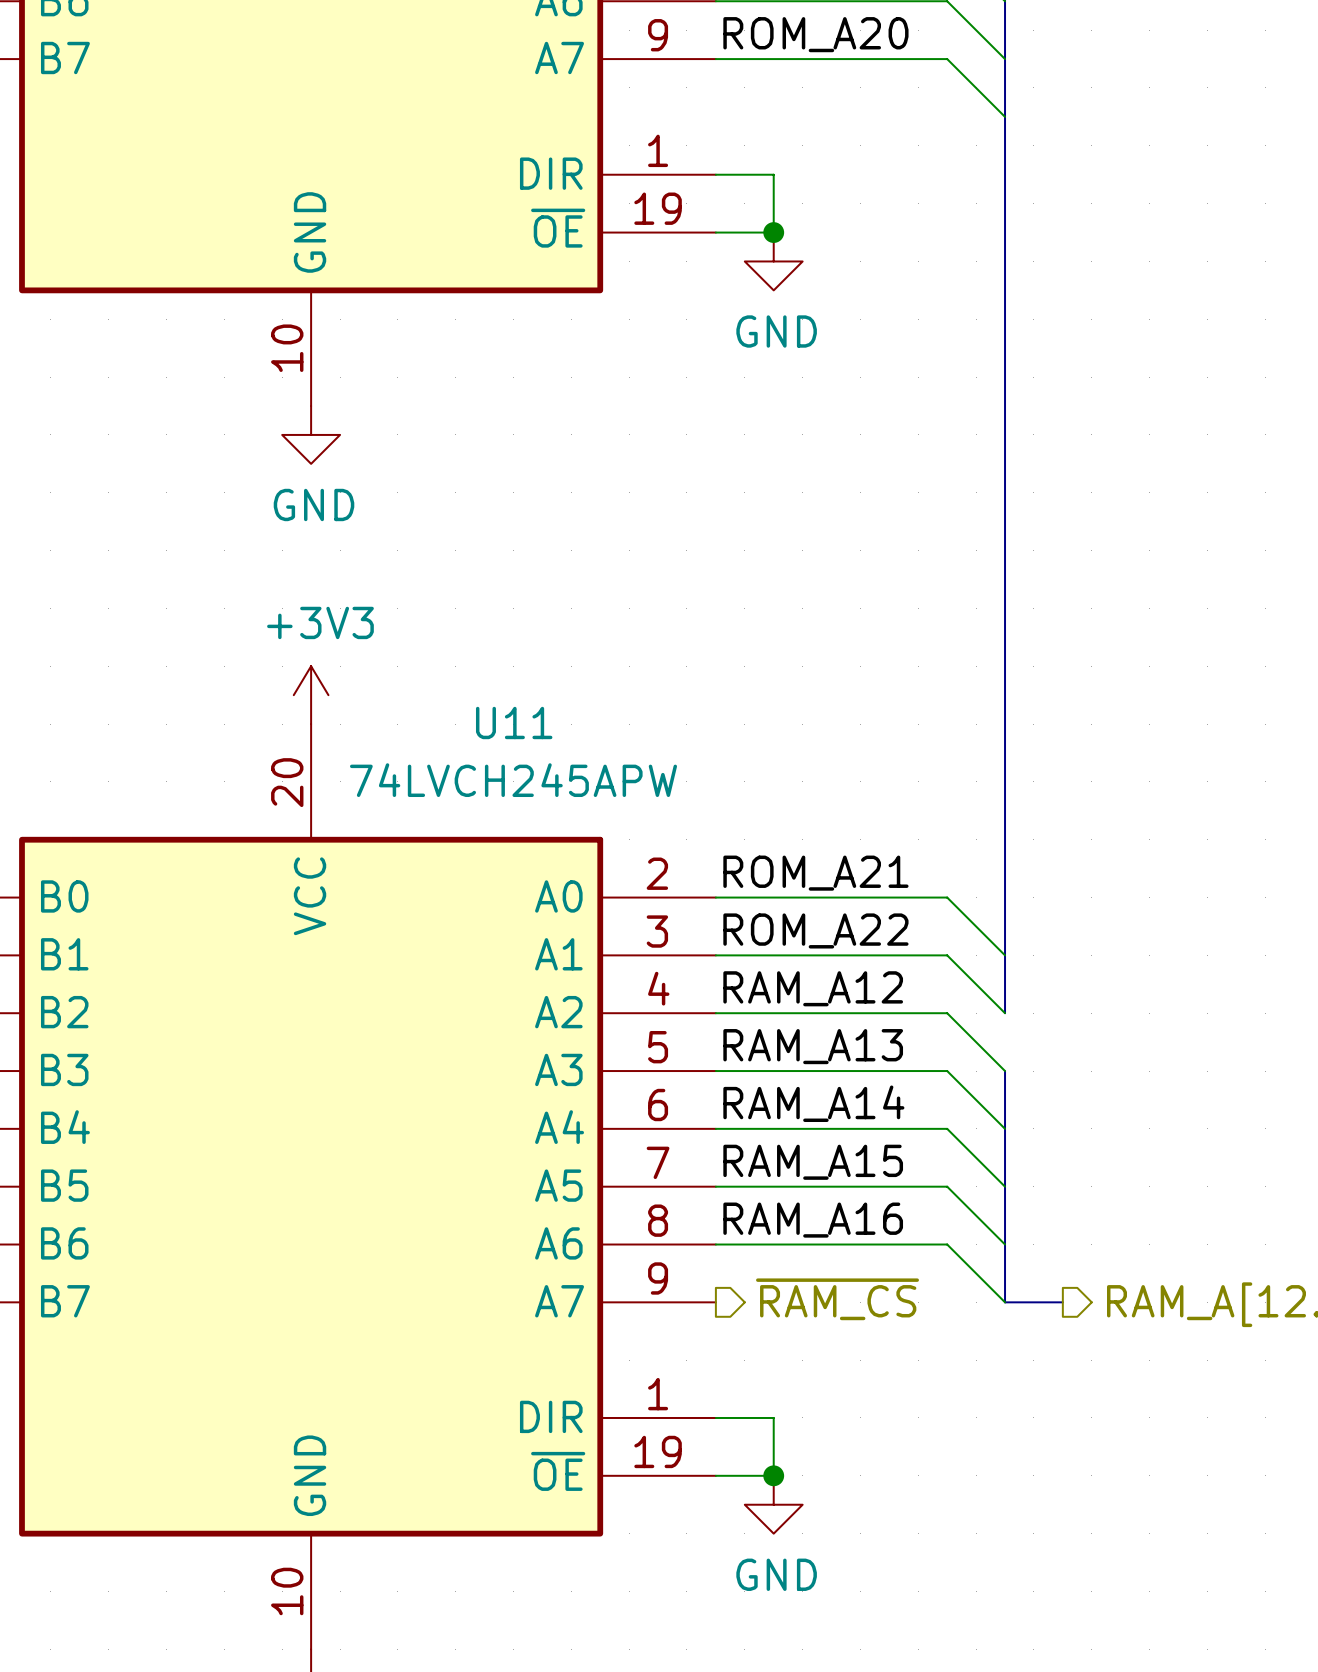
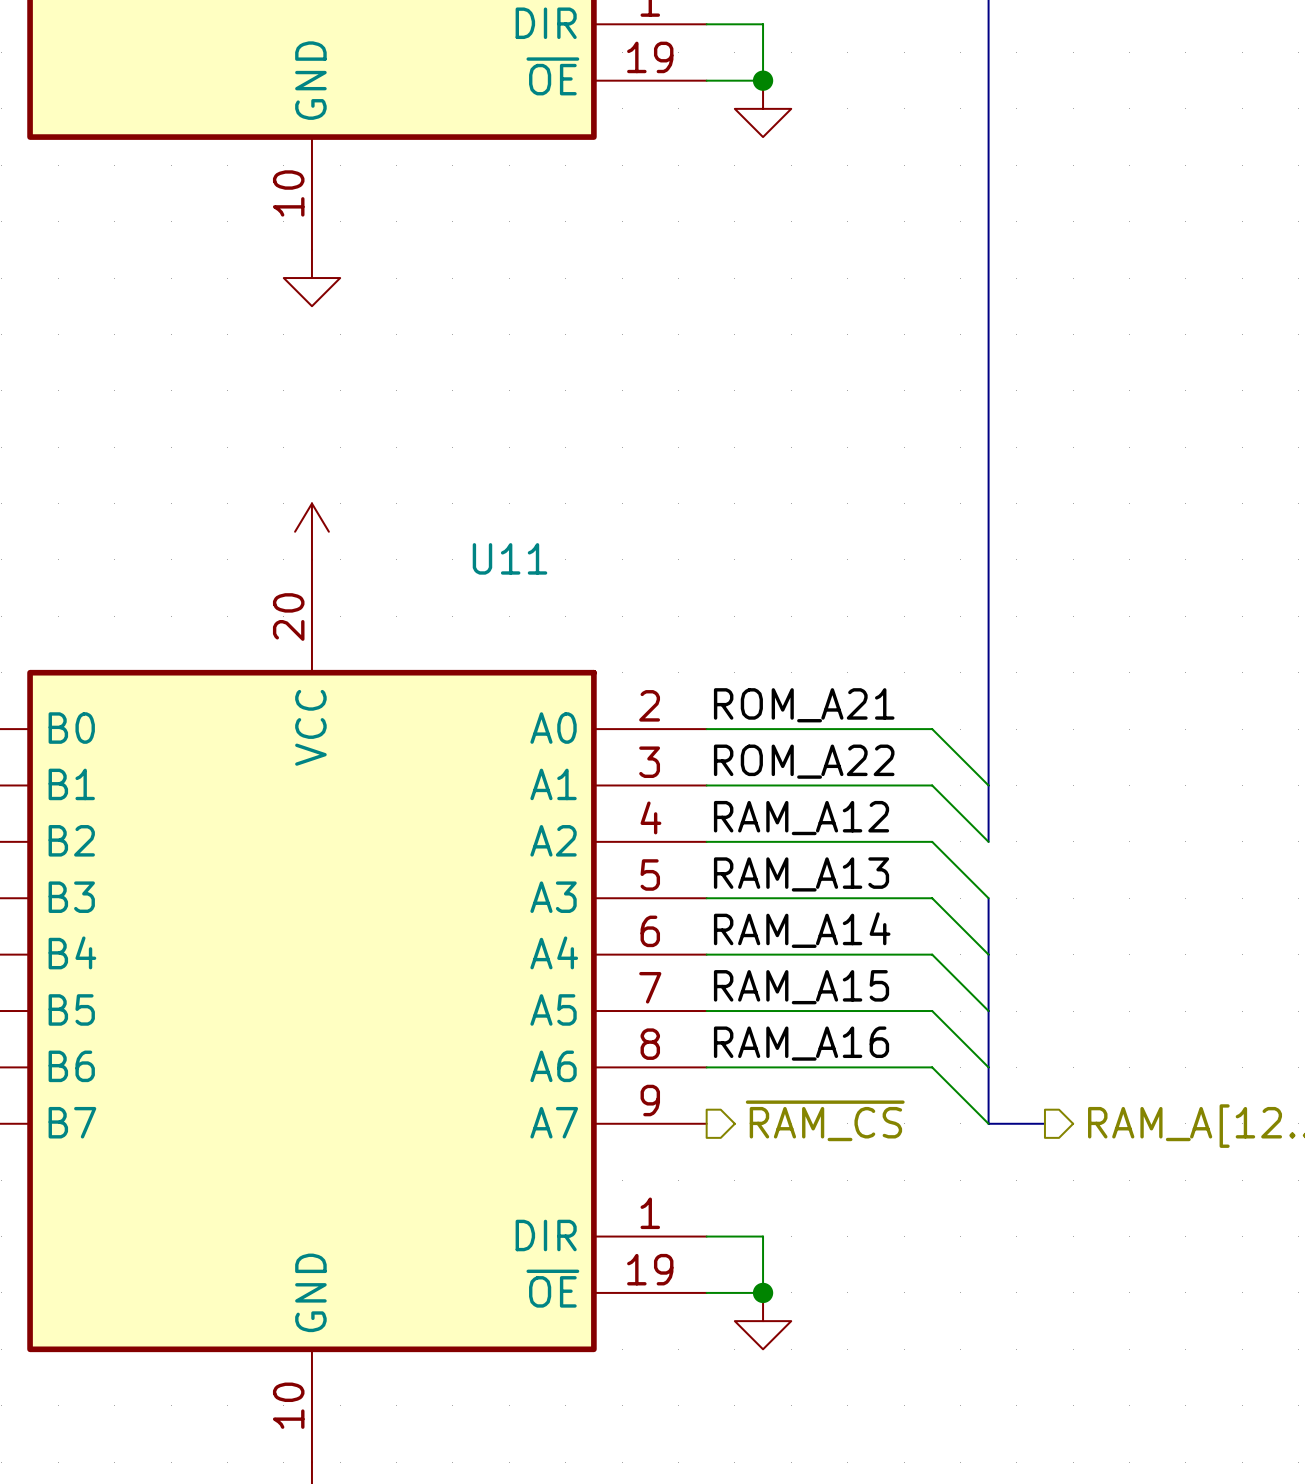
power symbol text: GND (776, 331) -> none
power symbol text: GND (314, 504) -> none
power symbol text: +3V3 (320, 622) -> none
U11 value: 74LVCH245APW (513, 780) -> none
power symbol text: GND (776, 1574) -> none

